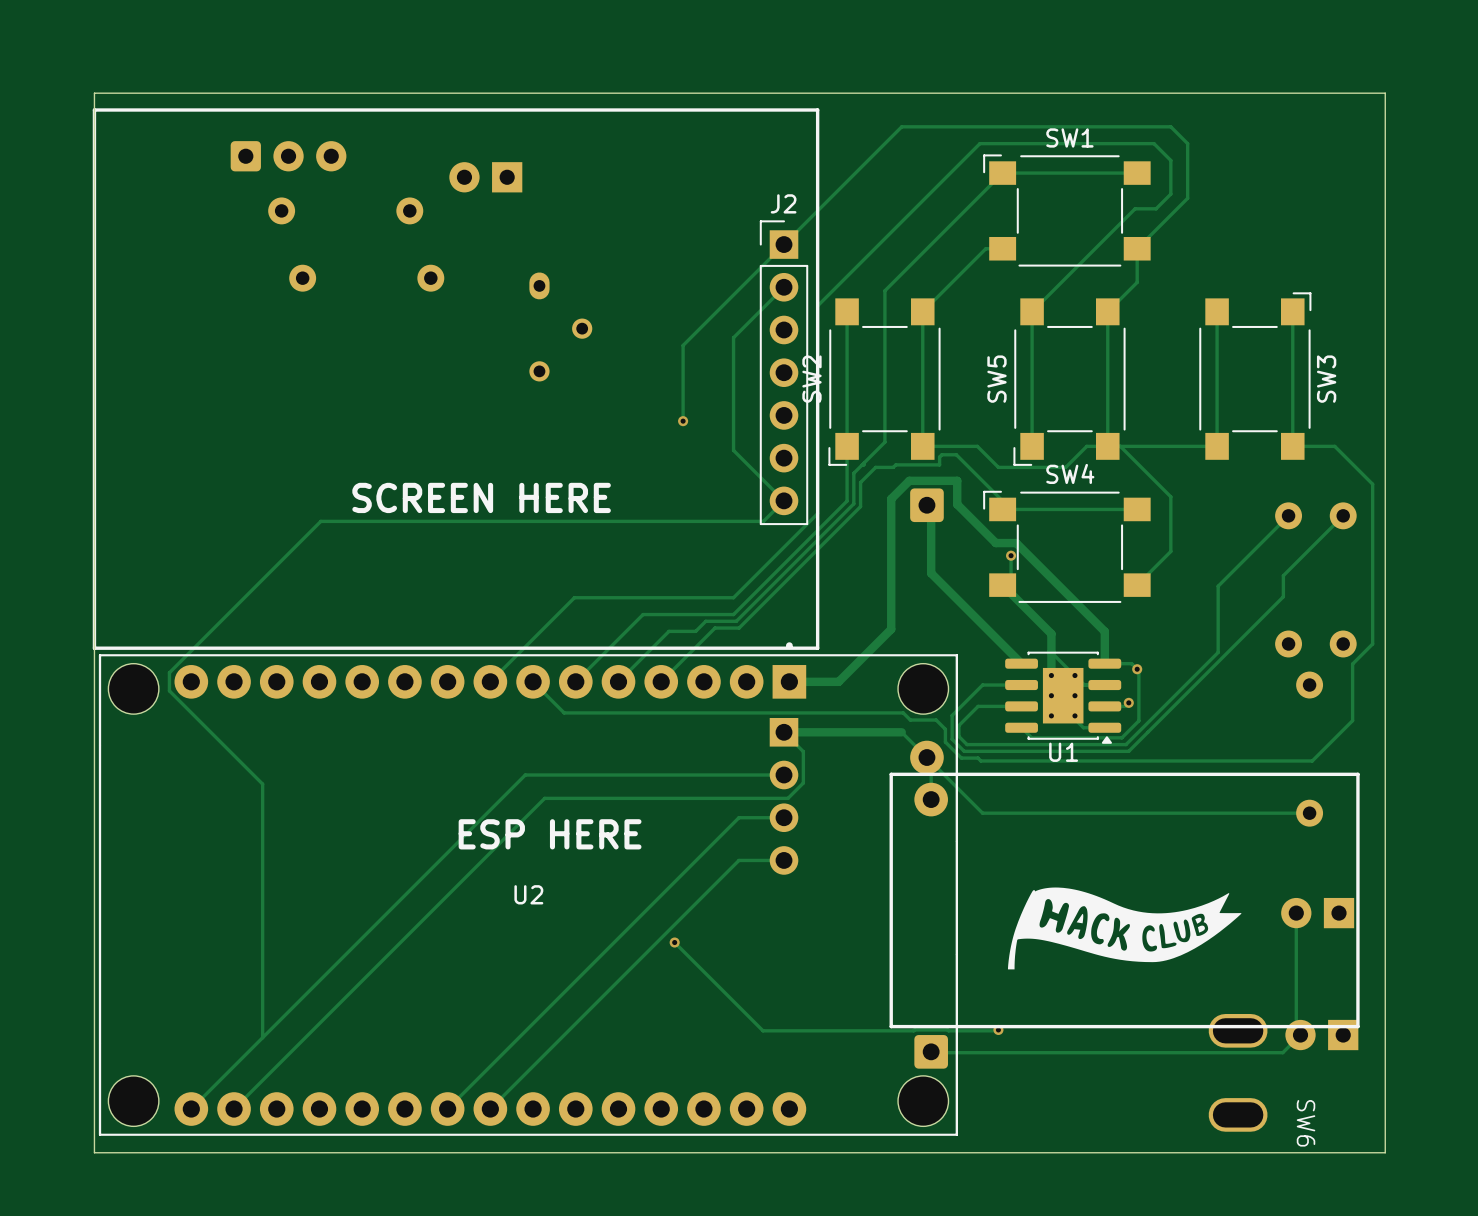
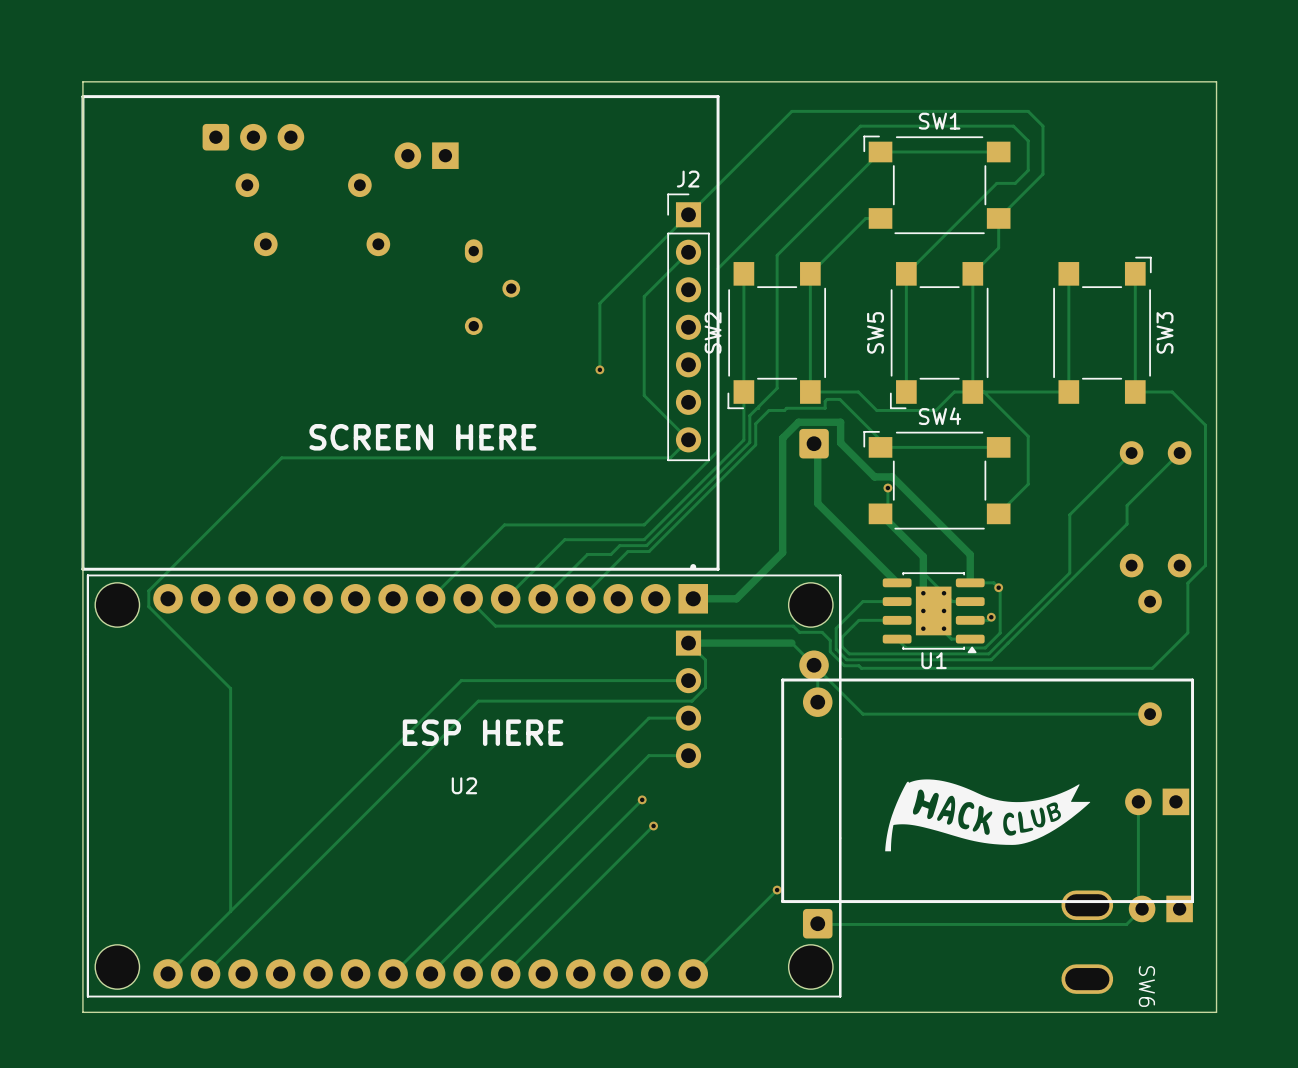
track: none -> (642, 799) (468, 973)
via: none -> (642, 799)
track: none -> (653, 826) (505, 973)
via: none -> (653, 826)
track: (674, 942) (762, 1030) (998, 1029) -> none
via: (674, 942) -> none
track: none -> (777, 890) (693, 973)
via: none -> (777, 890)
via: (998, 1029) -> none

